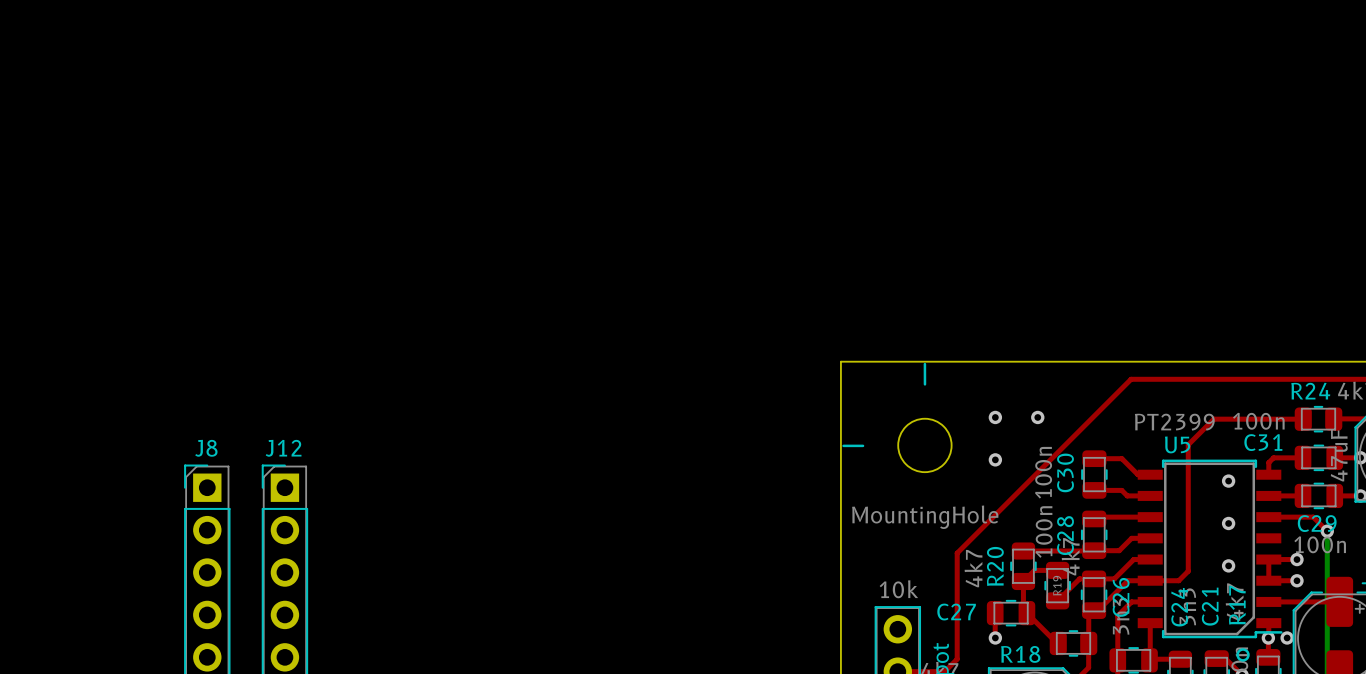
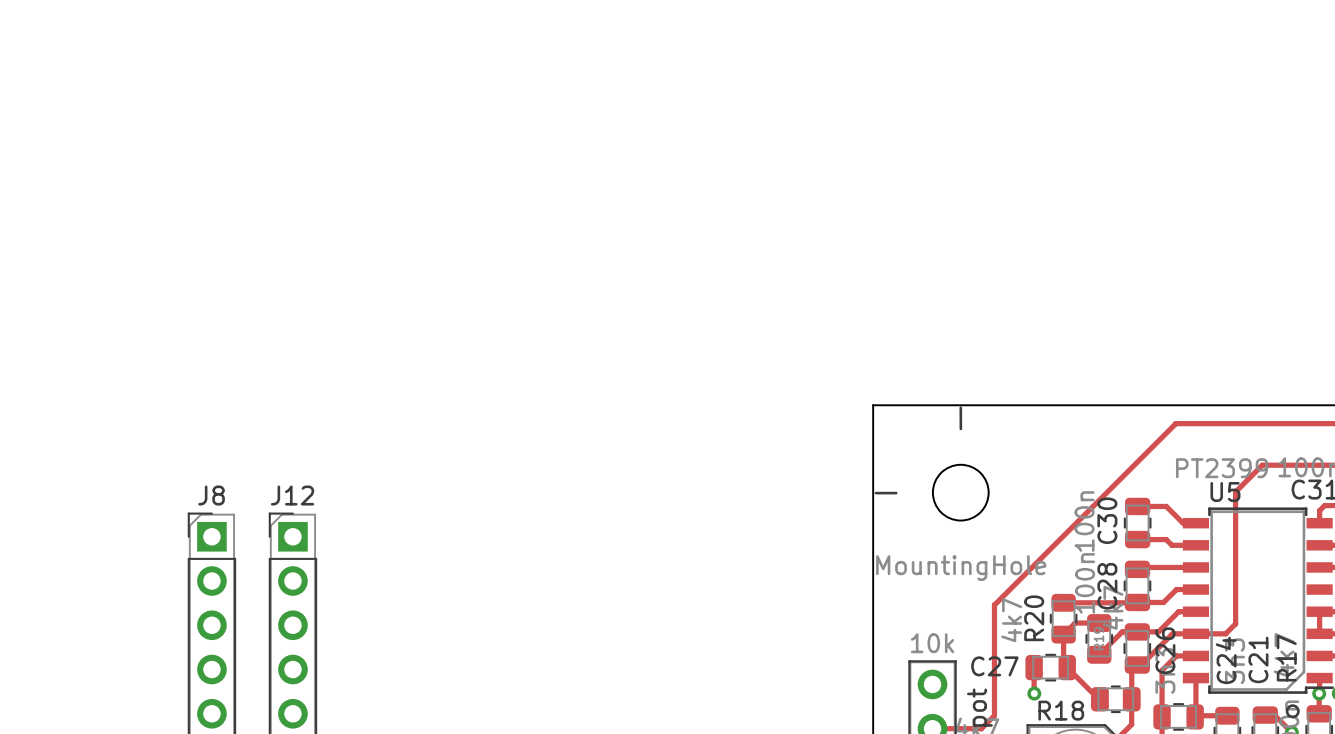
via: (995, 417) -> none
via: (1037, 417) -> none
via: (995, 459) -> none
via: (1228, 481) -> none
via: (1228, 523) -> none
via: (1228, 565) -> none

